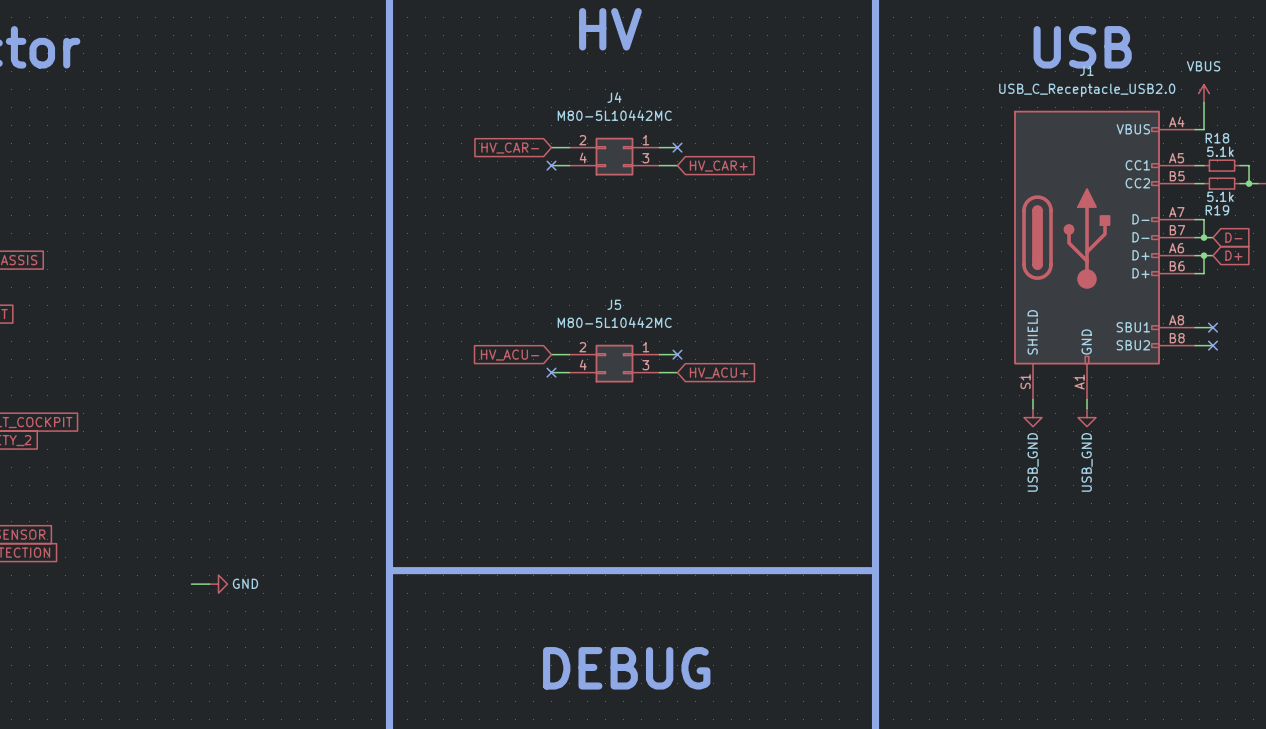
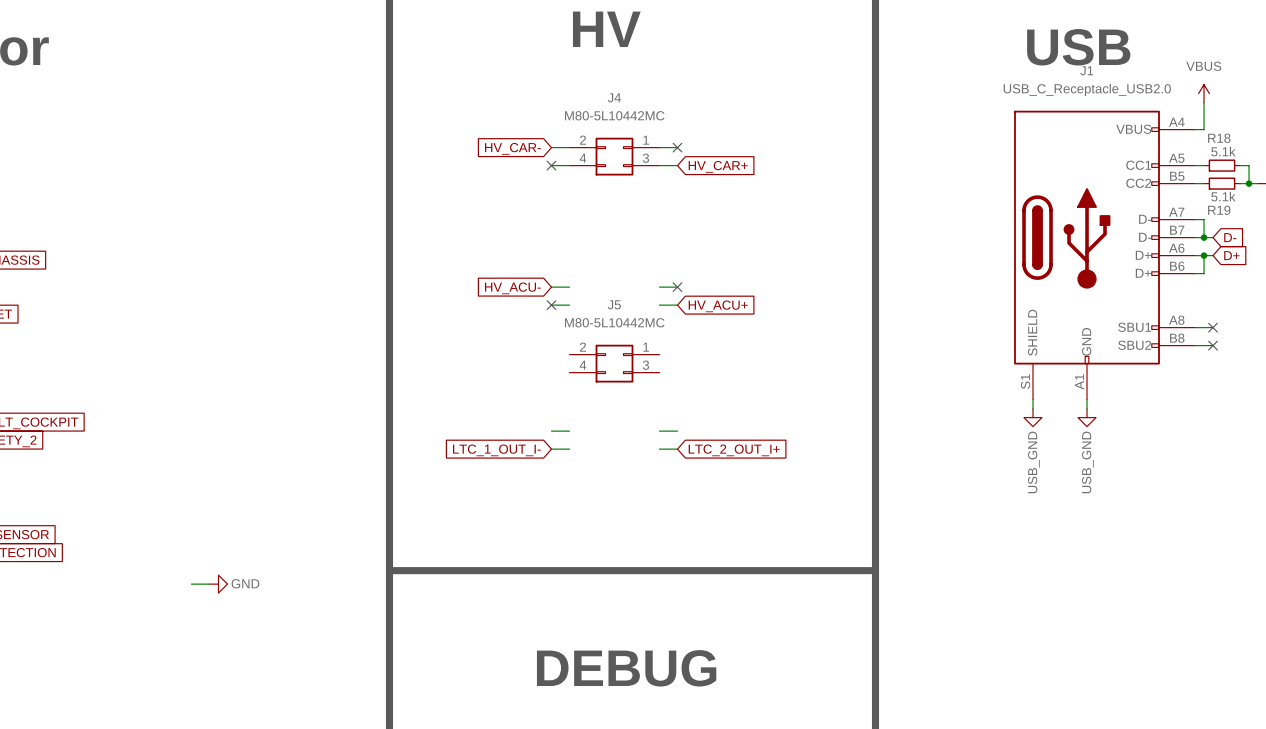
no-connect mark: none -> (677, 287)
no-connect mark: none -> (551, 305)
wire: (551, 354) (569, 354) -> (551, 287) (569, 287)
wire: (659, 354) (677, 354) -> (659, 287) (677, 287)
no-connect mark: (677, 354) -> none
global label position: HV_ACU- (510, 355) -> HV_ACU- (512, 288)
wire: (551, 372) (569, 372) -> (551, 305) (569, 305)
no-connect mark: (551, 372) -> none
wire: (659, 372) (677, 372) -> (659, 305) (677, 305)
global label position: HV_ACU+ (718, 373) -> HV_ACU+ (718, 306)
wire: none -> (551, 431) (569, 431)
wire: none -> (659, 431) (677, 431)
global label: none -> LTC_1_OUT_I- (496, 450)
wire: none -> (551, 449) (569, 449)
wire: none -> (659, 449) (677, 449)
global label: none -> LTC_2_OUT_I+ (734, 450)

